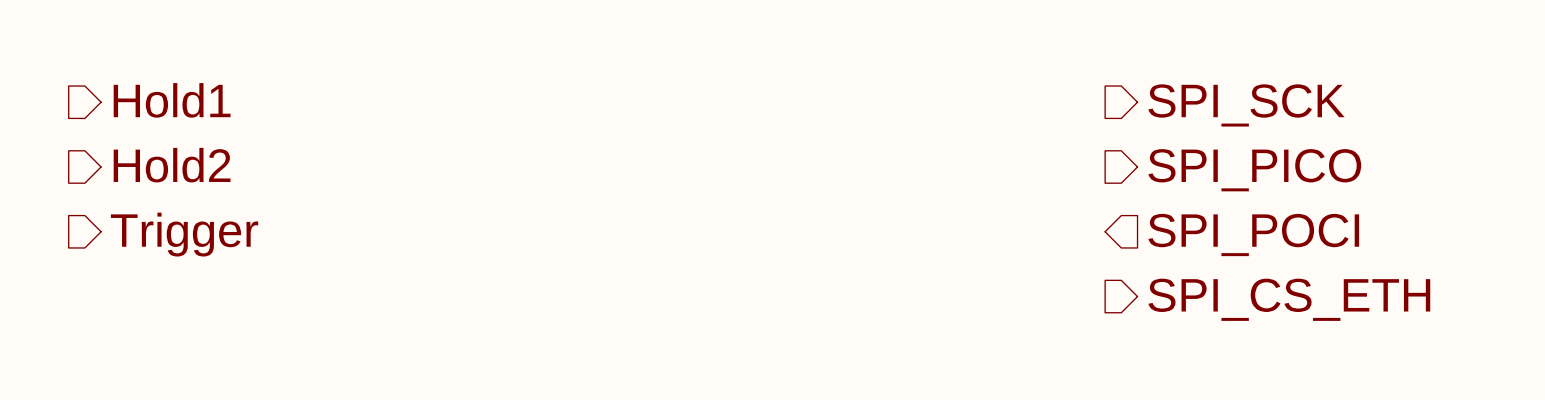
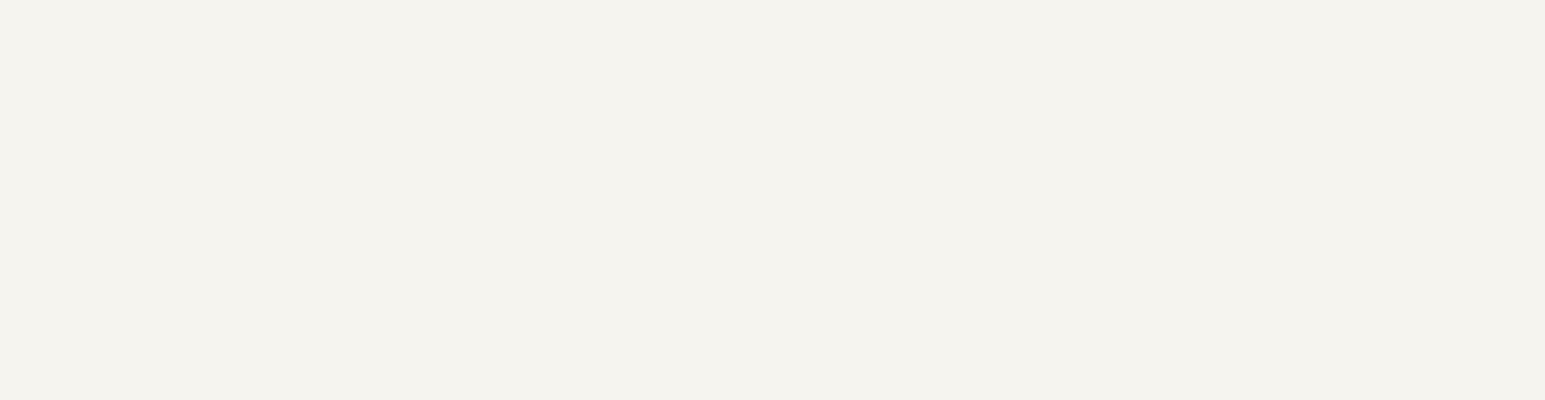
hierarchical label: Hold1 (172, 100) -> none
hierarchical label: SPI_SCK (1246, 105) -> none
hierarchical label: Hold2 (172, 165) -> none
hierarchical label: SPI_PICO (1254, 170) -> none
hierarchical label: Trigger (184, 234) -> none
hierarchical label: SPI_POCI (1253, 235) -> none
hierarchical label: SPI_CS_ETH (1289, 299) -> none

